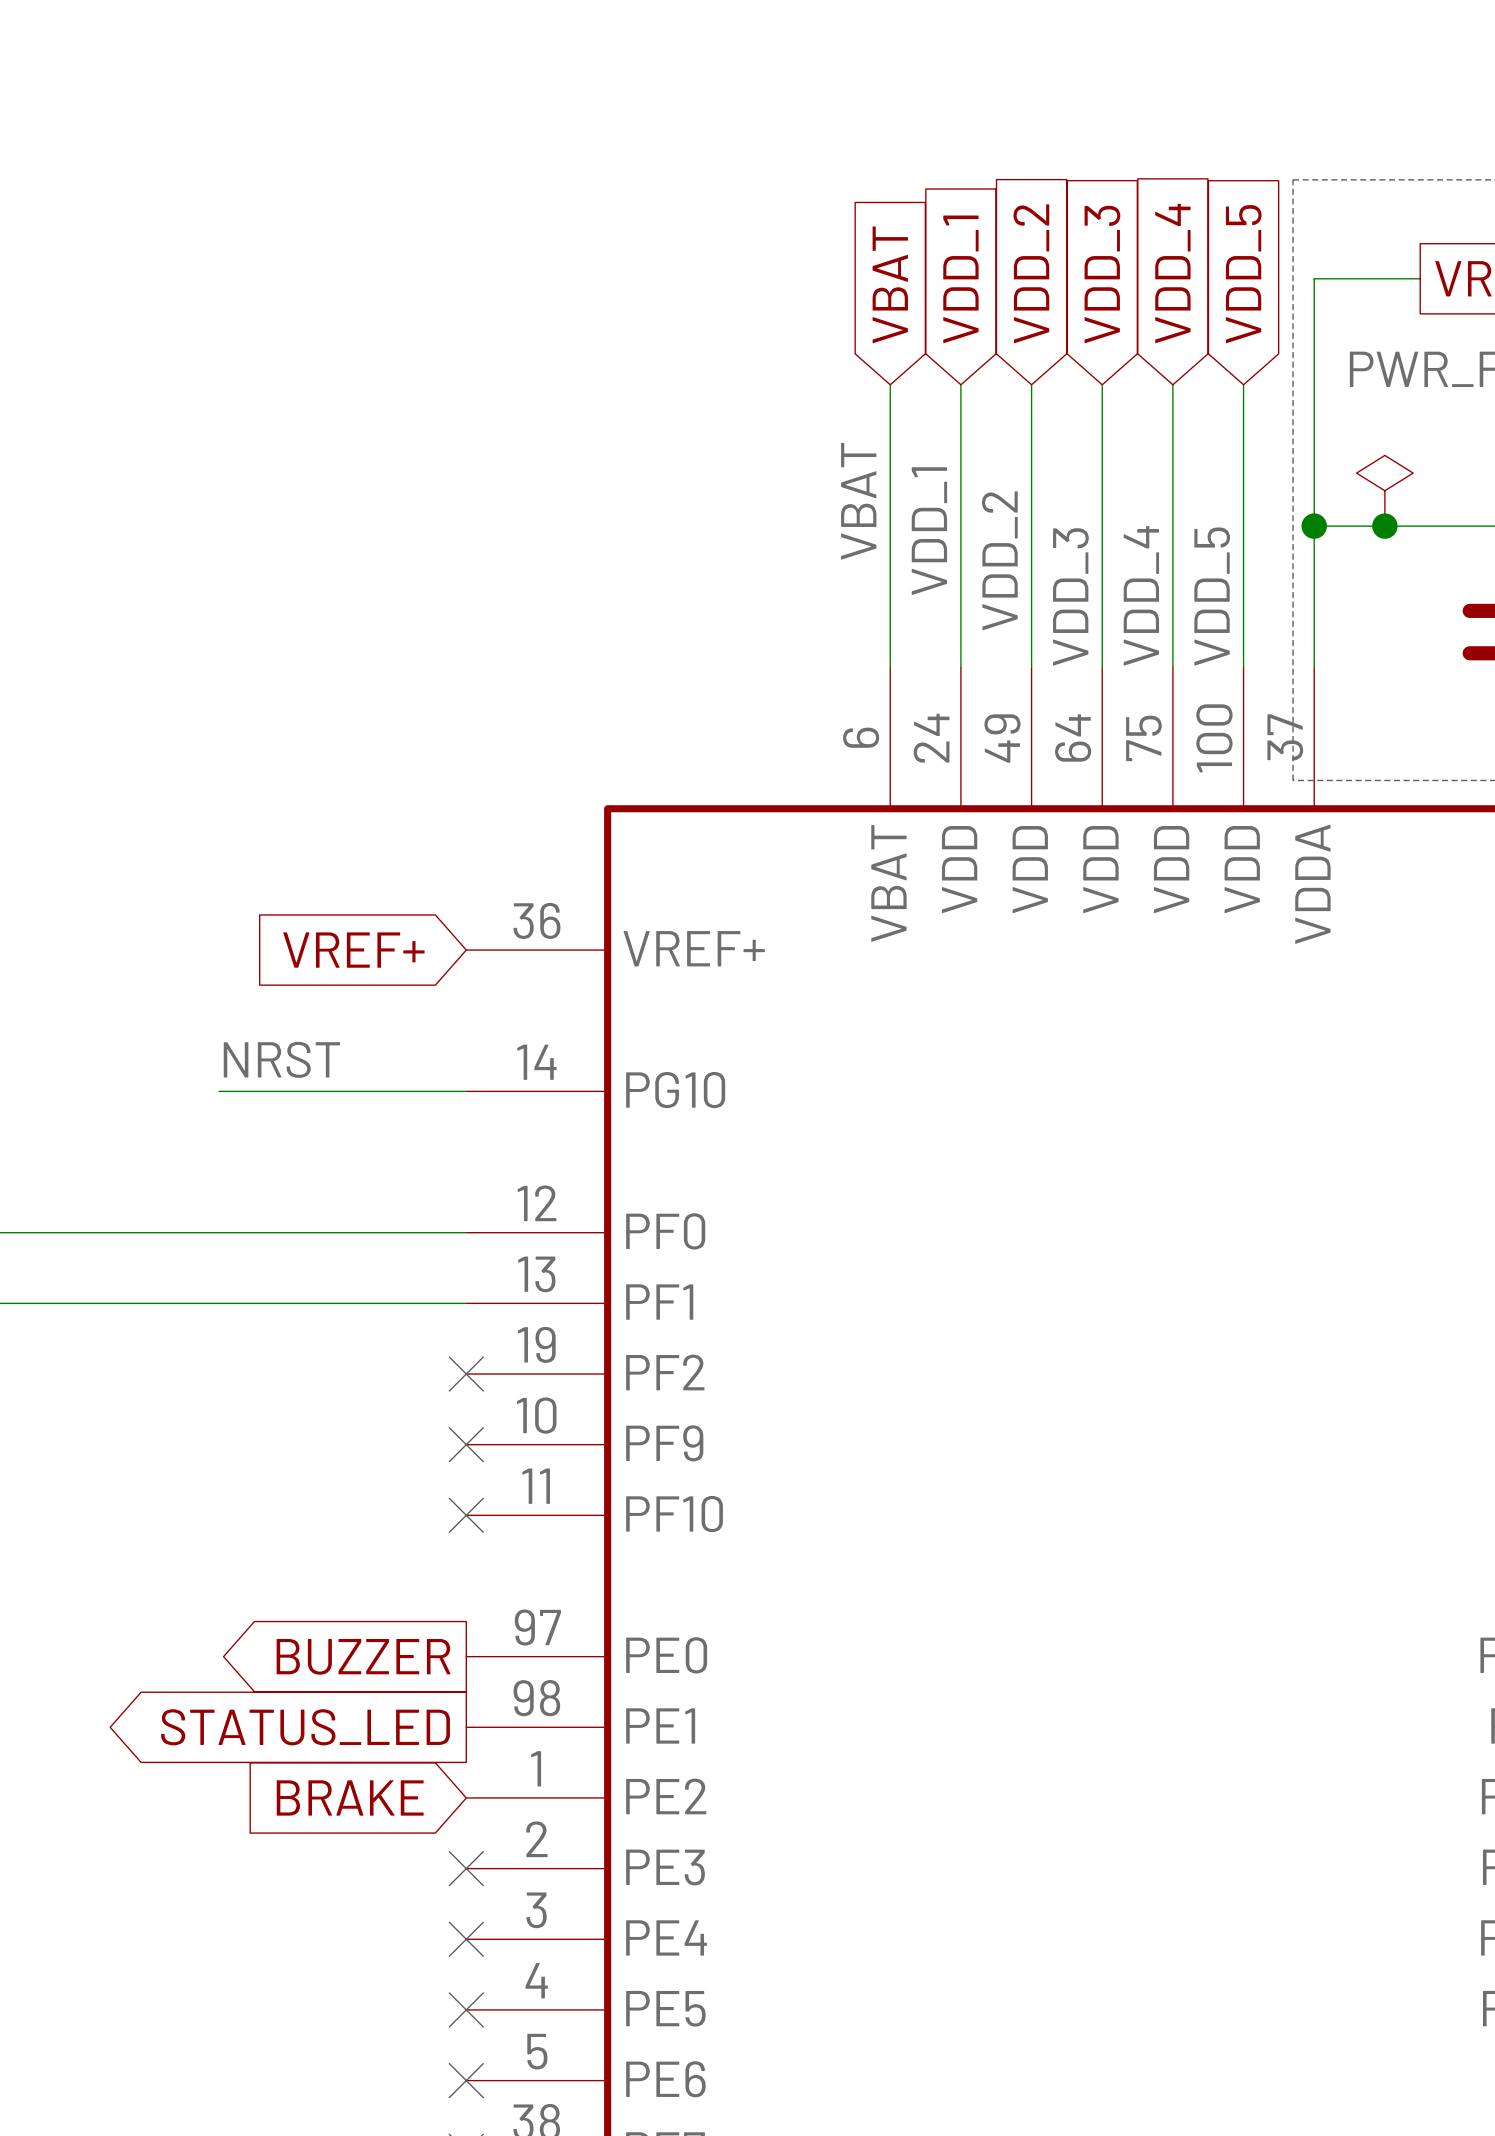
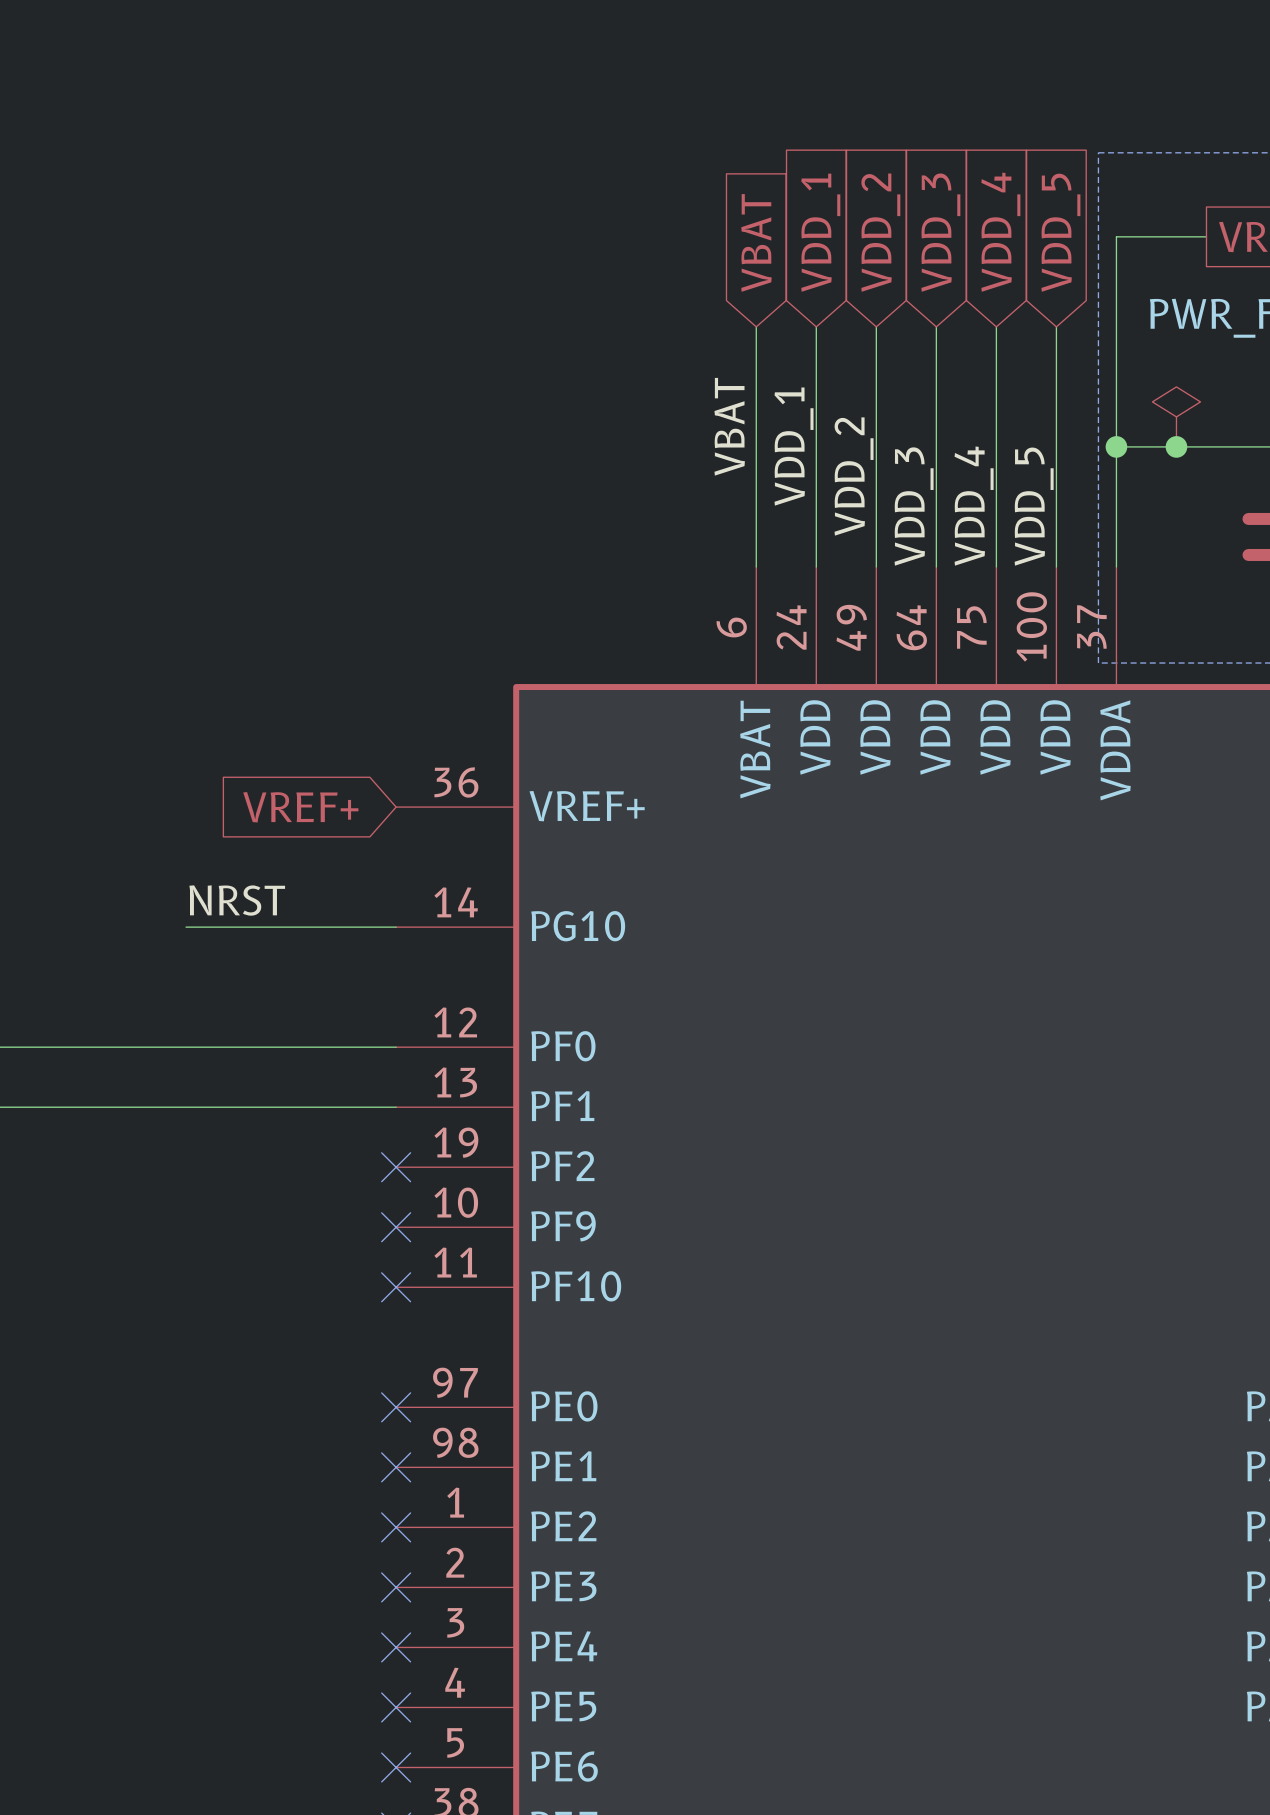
global label: BUZZER (363, 1656) -> none
no-connect mark: none -> (396, 1407)
global label: STATUS_LED (305, 1727) -> none
no-connect mark: none -> (396, 1467)
global label: BRAKE (350, 1797) -> none
no-connect mark: none -> (396, 1527)

